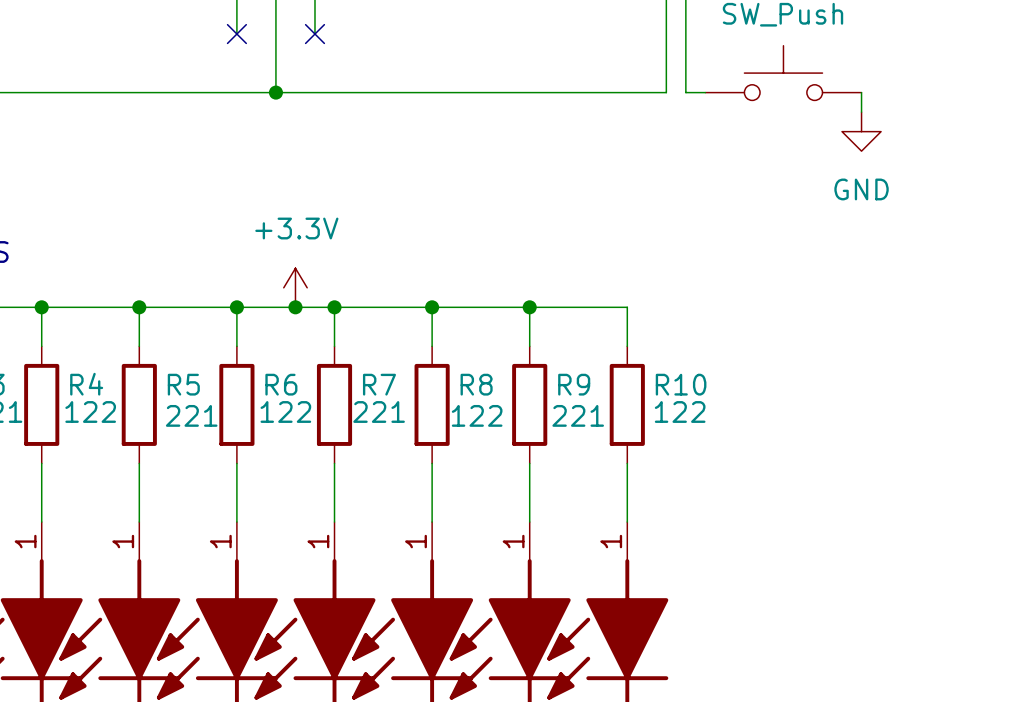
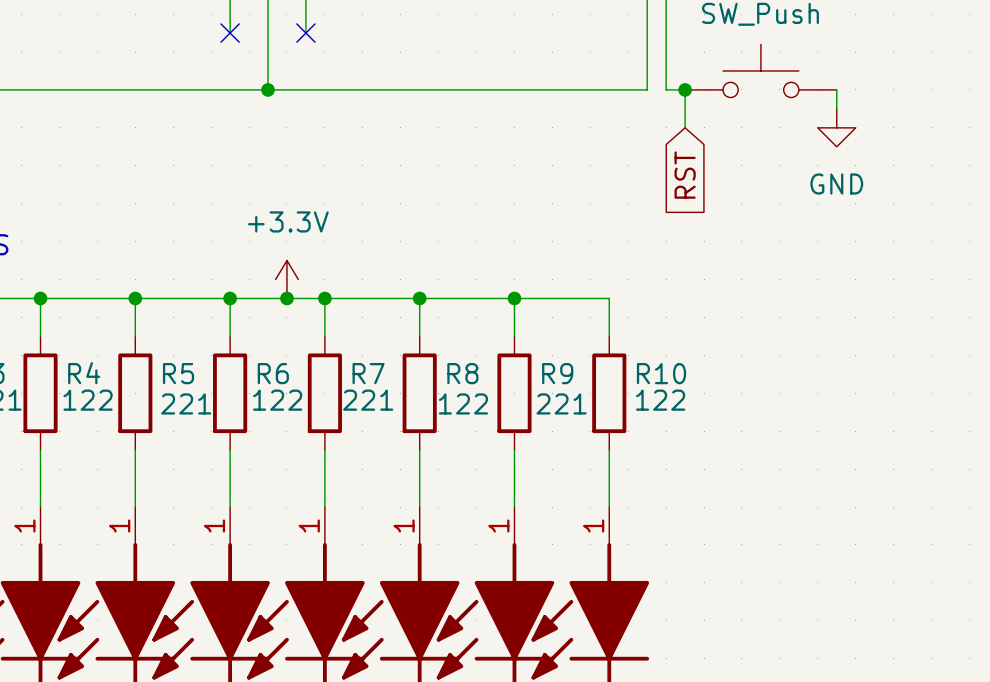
wire: none -> (685, 89) (685, 127)
junction: none -> (685, 89)
global label: none -> RST (685, 175)

